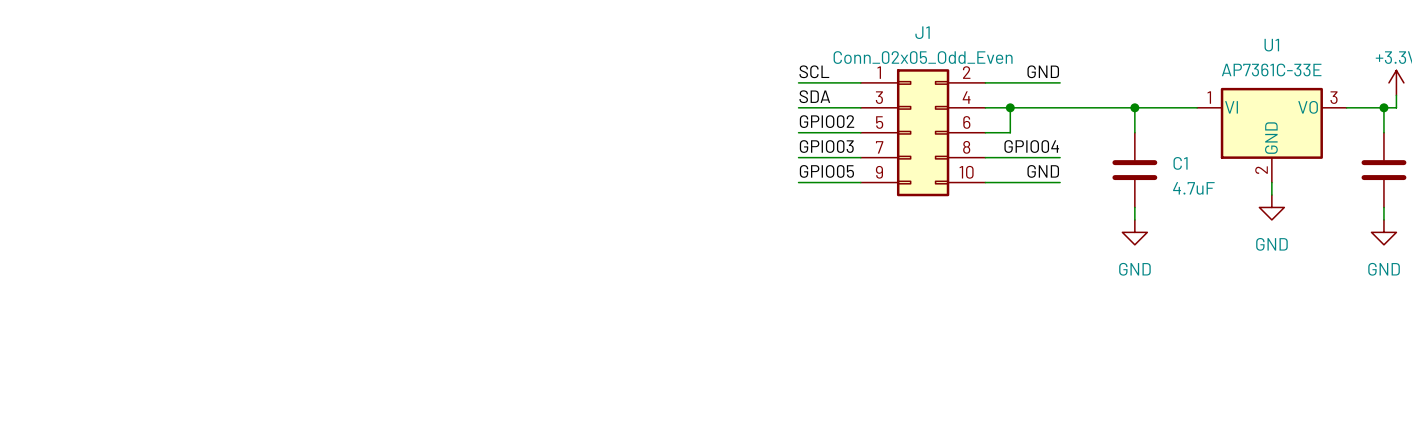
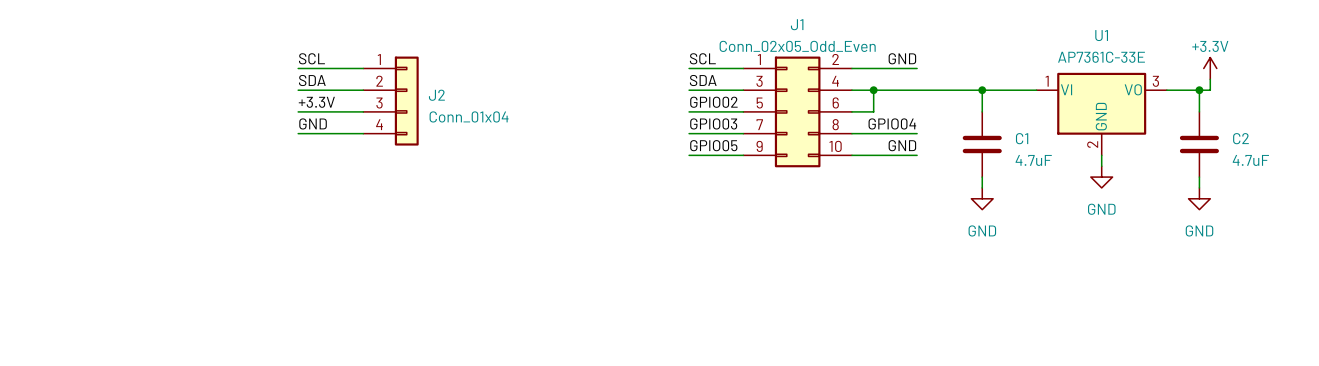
label: none -> SCL (311, 58)
wire: none -> (298, 68) (363, 68)
label: none -> SDA (312, 80)
wire: none -> (298, 90) (363, 90)
J2: none -> Conn_01x04 (391, 101)
label: none -> +3.3V (316, 102)
wire: none -> (298, 111) (363, 111)
label: none -> GND (313, 123)
wire: none -> (298, 133) (363, 133)

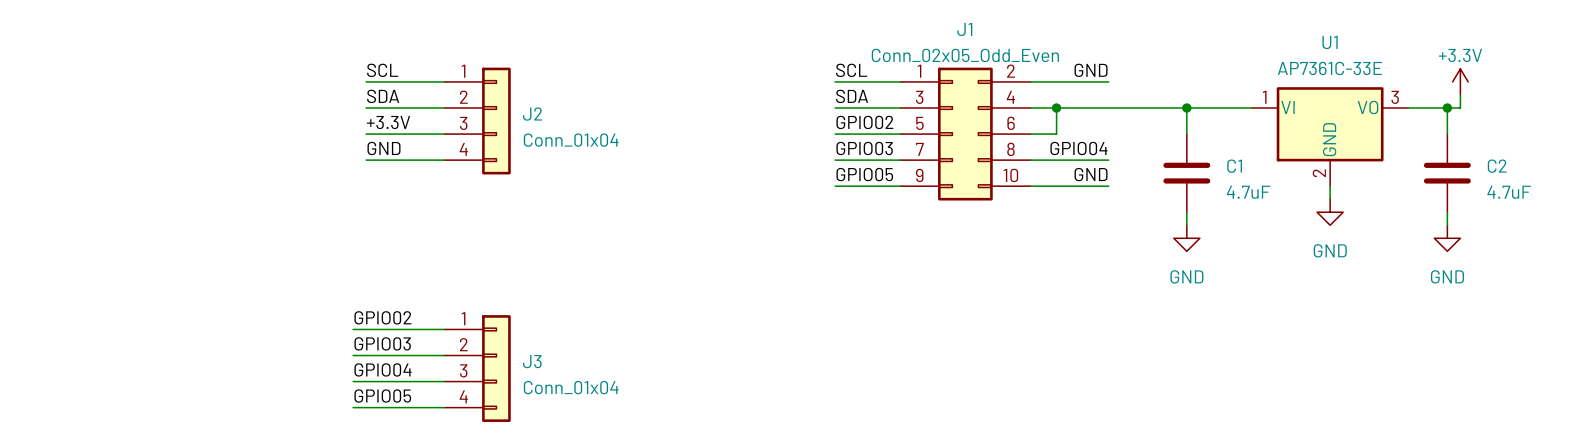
label: none -> GPIO02 (382, 317)
wire: none -> (353, 329) (444, 329)
label: none -> GPIO03 (382, 343)
wire: none -> (353, 355) (444, 355)
J3: none -> Conn_01x04 (477, 368)
label: none -> GPIO04 (383, 369)
wire: none -> (353, 381) (444, 381)
label: none -> GPIO05 (382, 396)
wire: none -> (353, 407) (444, 407)

